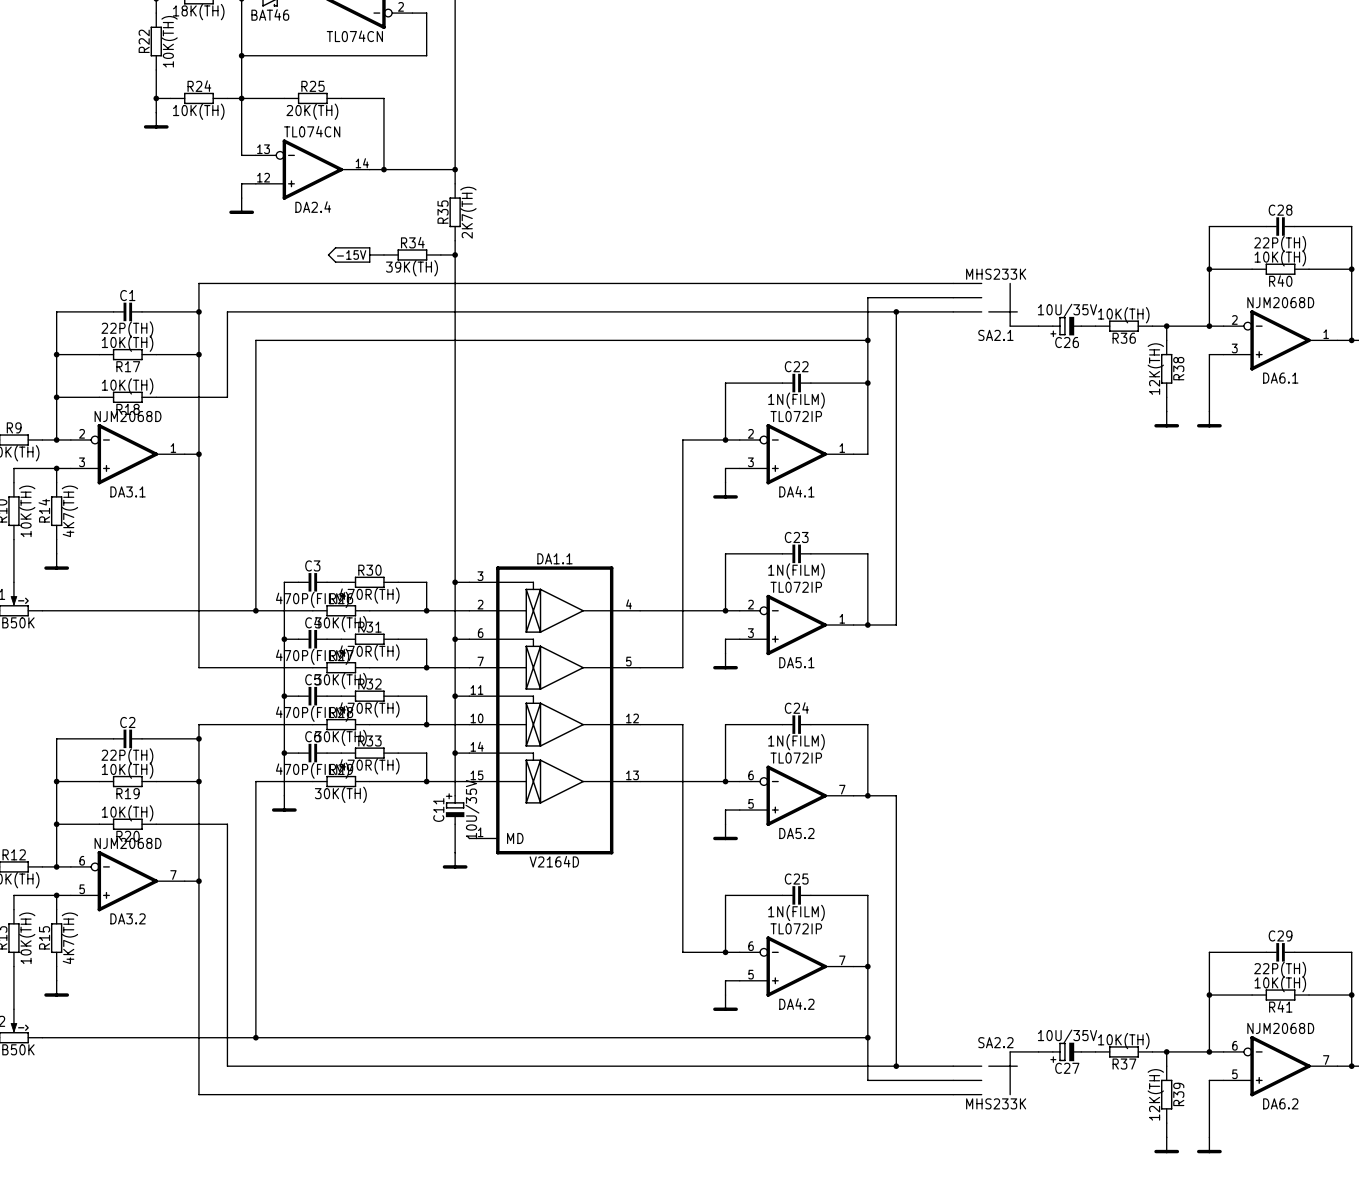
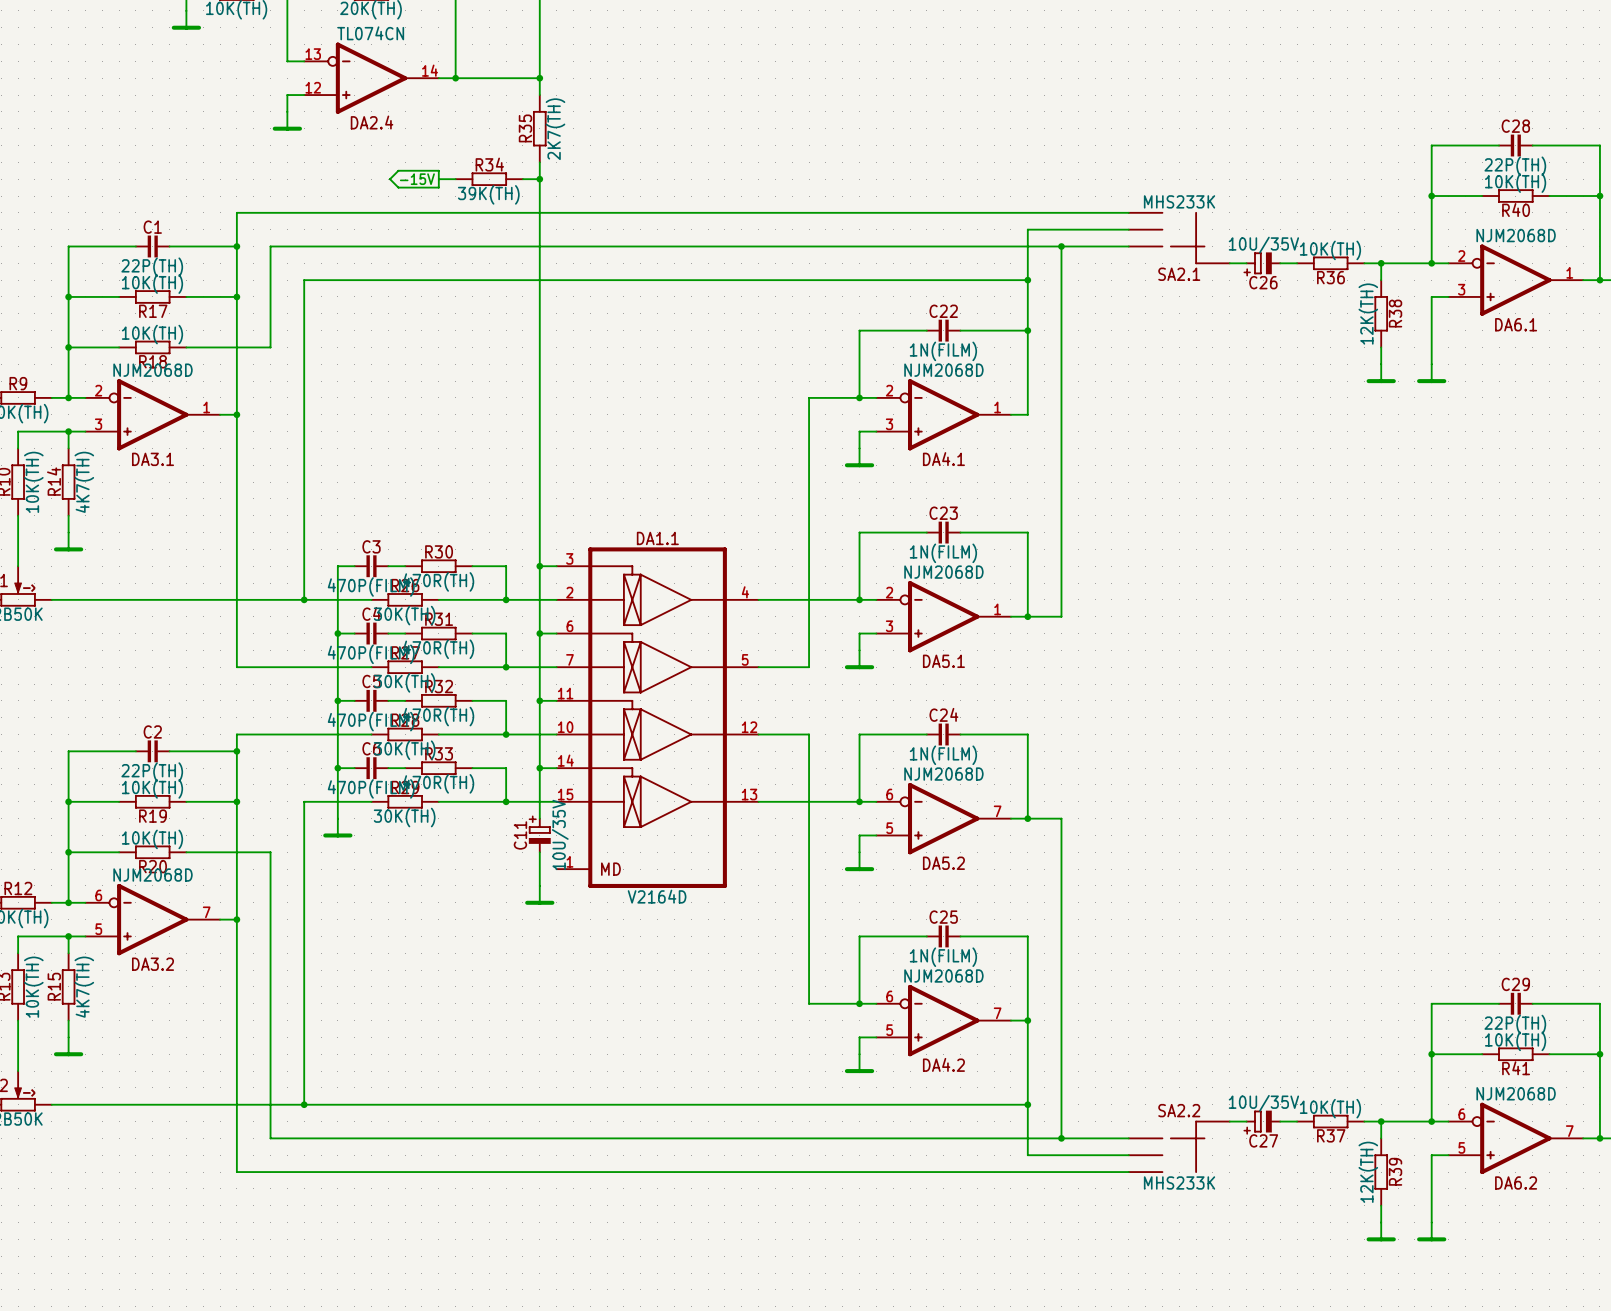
DA4.1 value: TL072IP (796, 416) -> NJM2068D (943, 370)
DA5.1 value: TL072IP (796, 587) -> NJM2068D (943, 572)
DA5.2 value: TL072IP (796, 758) -> NJM2068D (943, 774)
DA4.2 value: TL072IP (796, 928) -> NJM2068D (943, 975)

